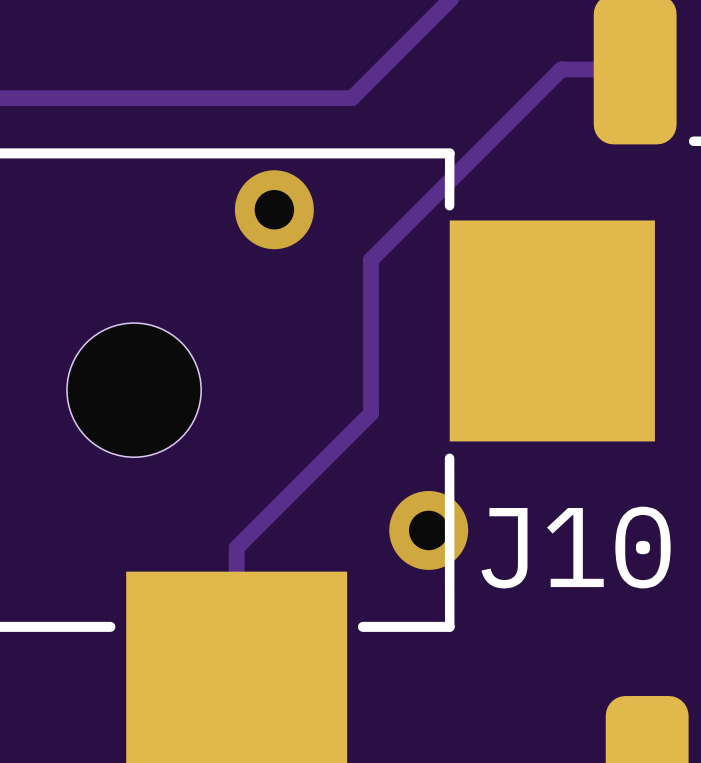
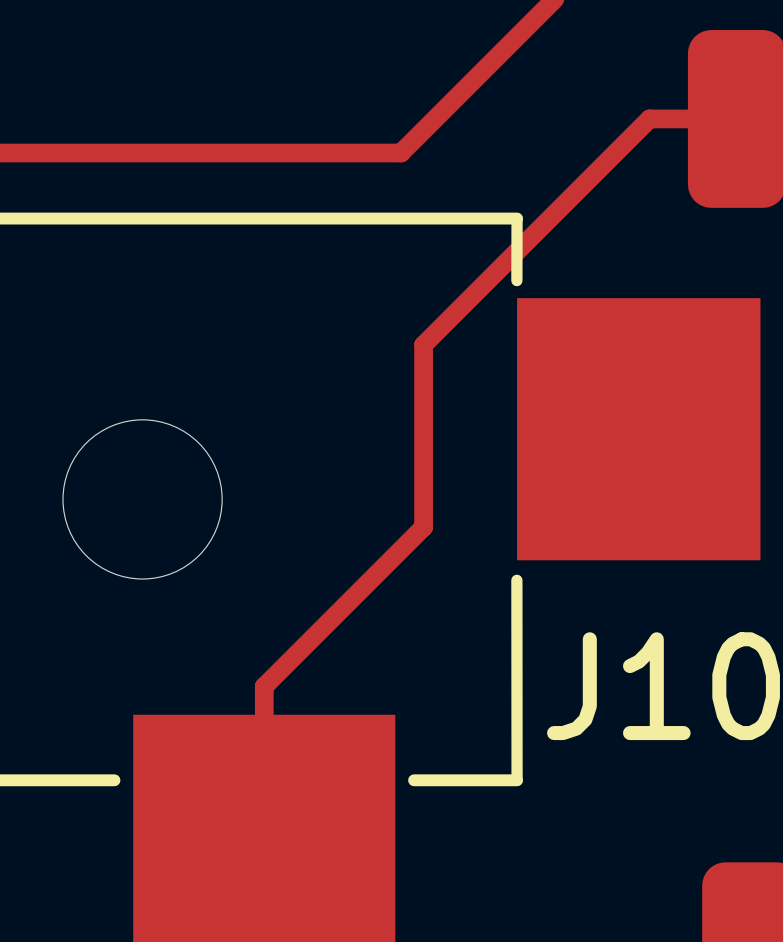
via: (274, 209) -> none
via: (428, 530) -> none

